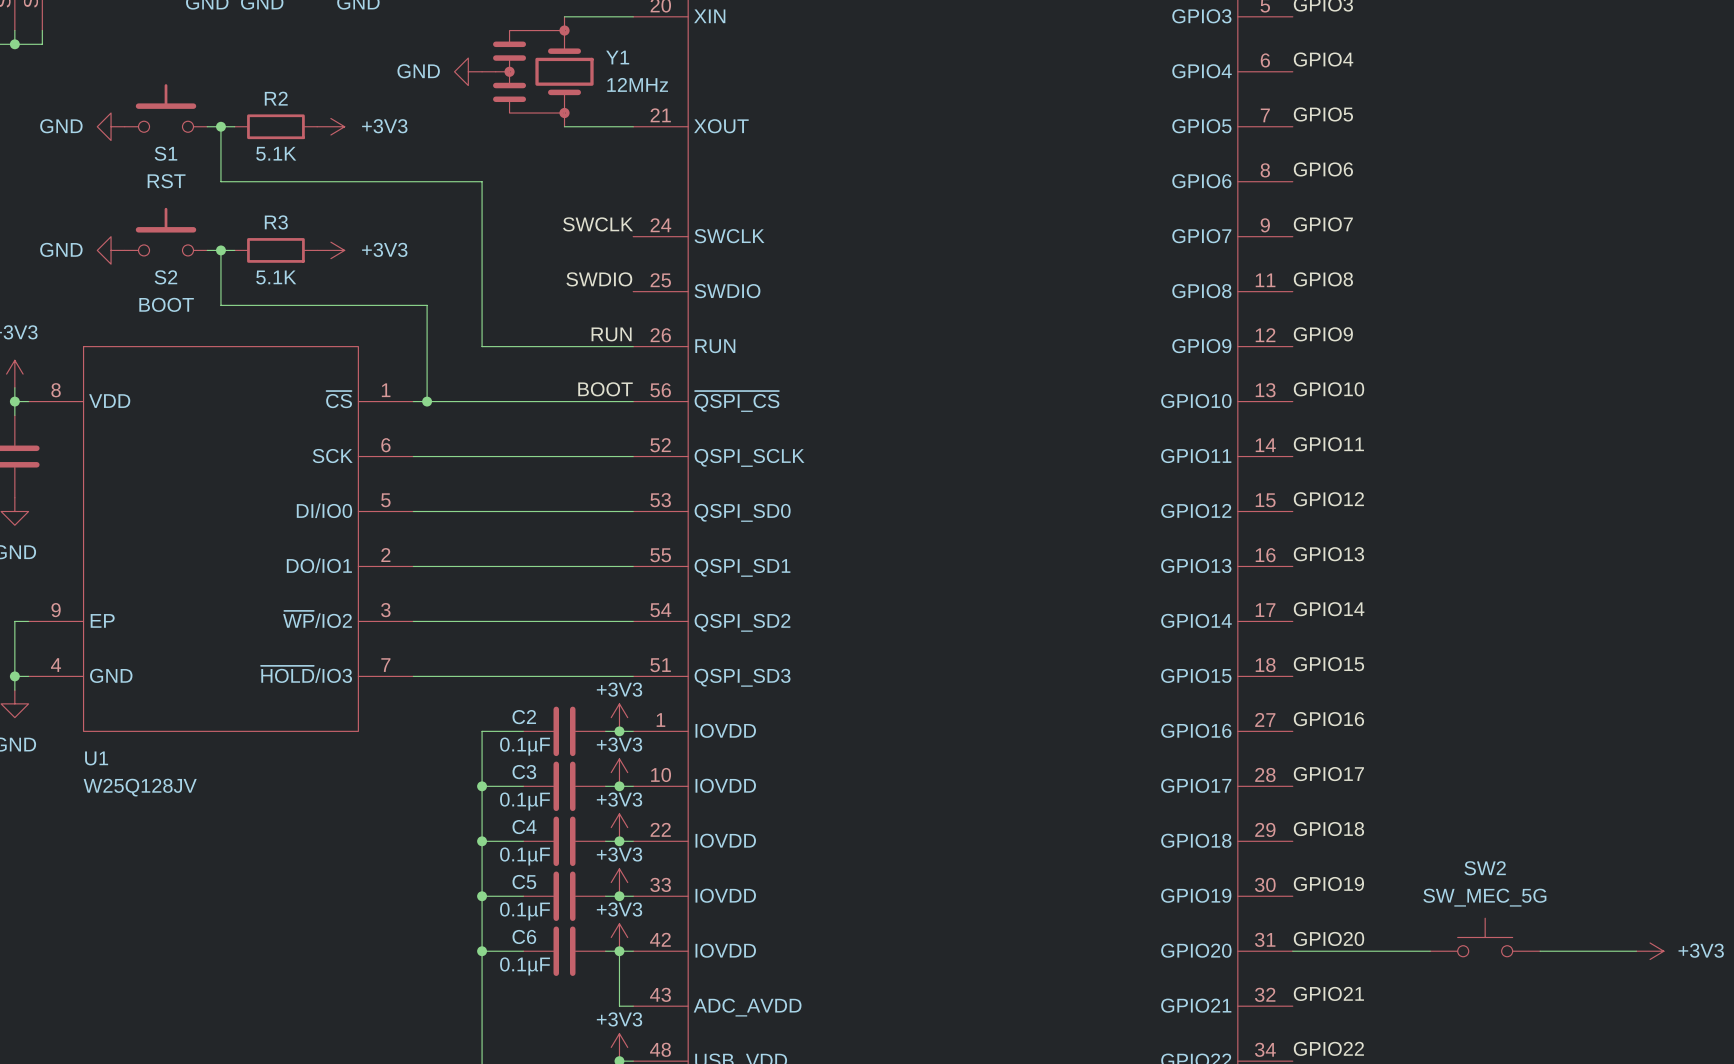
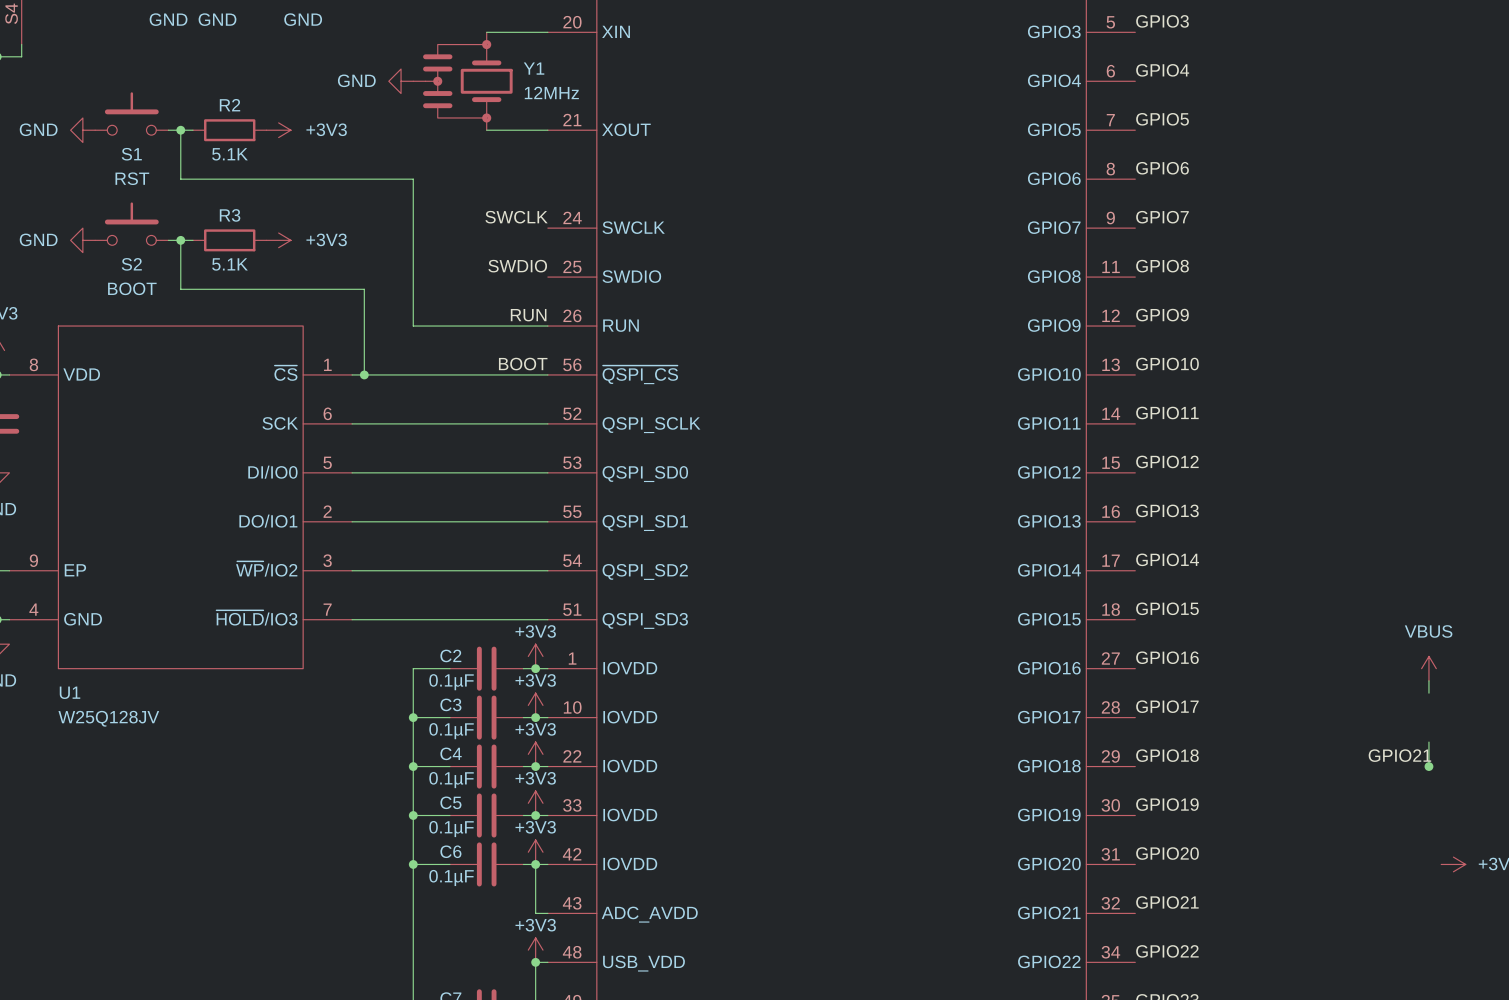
power symbol: none -> VBUS (1428, 668)
wire: none -> (1428, 680) (1428, 693)
wire: none -> (1428, 742) (1428, 766)
label: none -> GPIO21 (1399, 755)
junction: none -> (1428, 766)
SW2: SW_MEC_5G (1485, 937) -> none
wire: (1292, 951) (1430, 951) -> none
wire: (1540, 951) (1636, 951) -> none

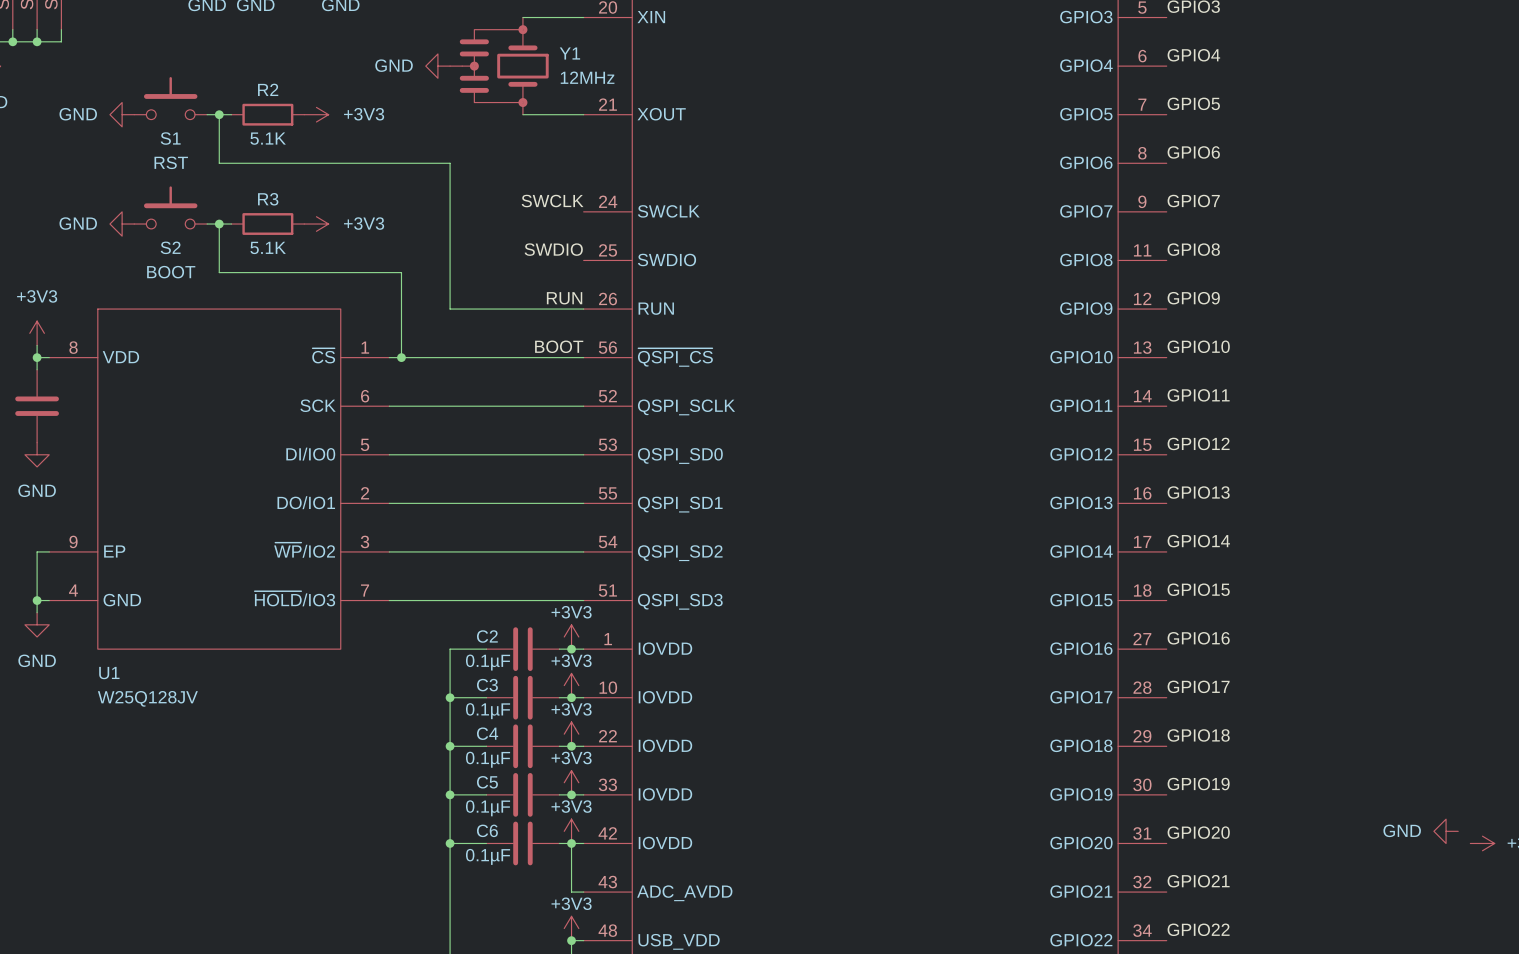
power symbol: VBUS (1428, 668) -> none
wire: (1428, 680) (1428, 693) -> none
wire: (1428, 742) (1428, 766) -> none
label: GPIO21 (1399, 755) -> none
junction: (1428, 766) -> none
power symbol: none -> GND (1446, 831)

